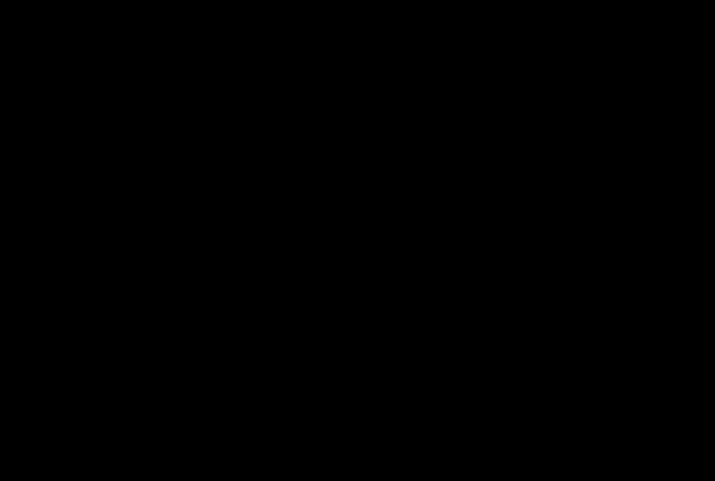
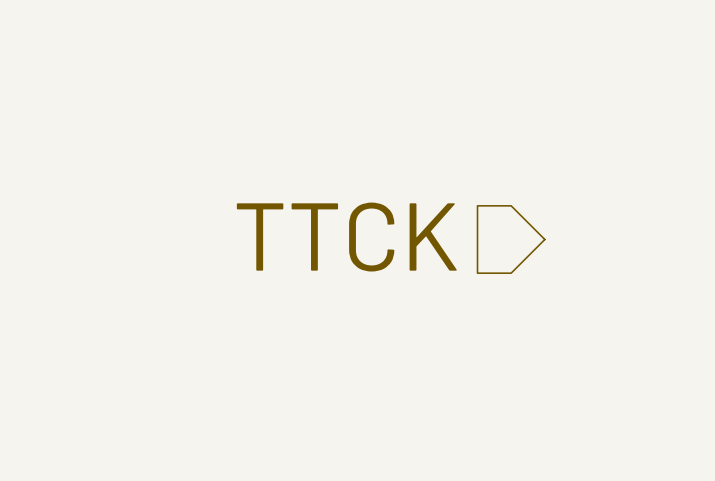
hierarchical label: none -> TTCK (346, 237)

